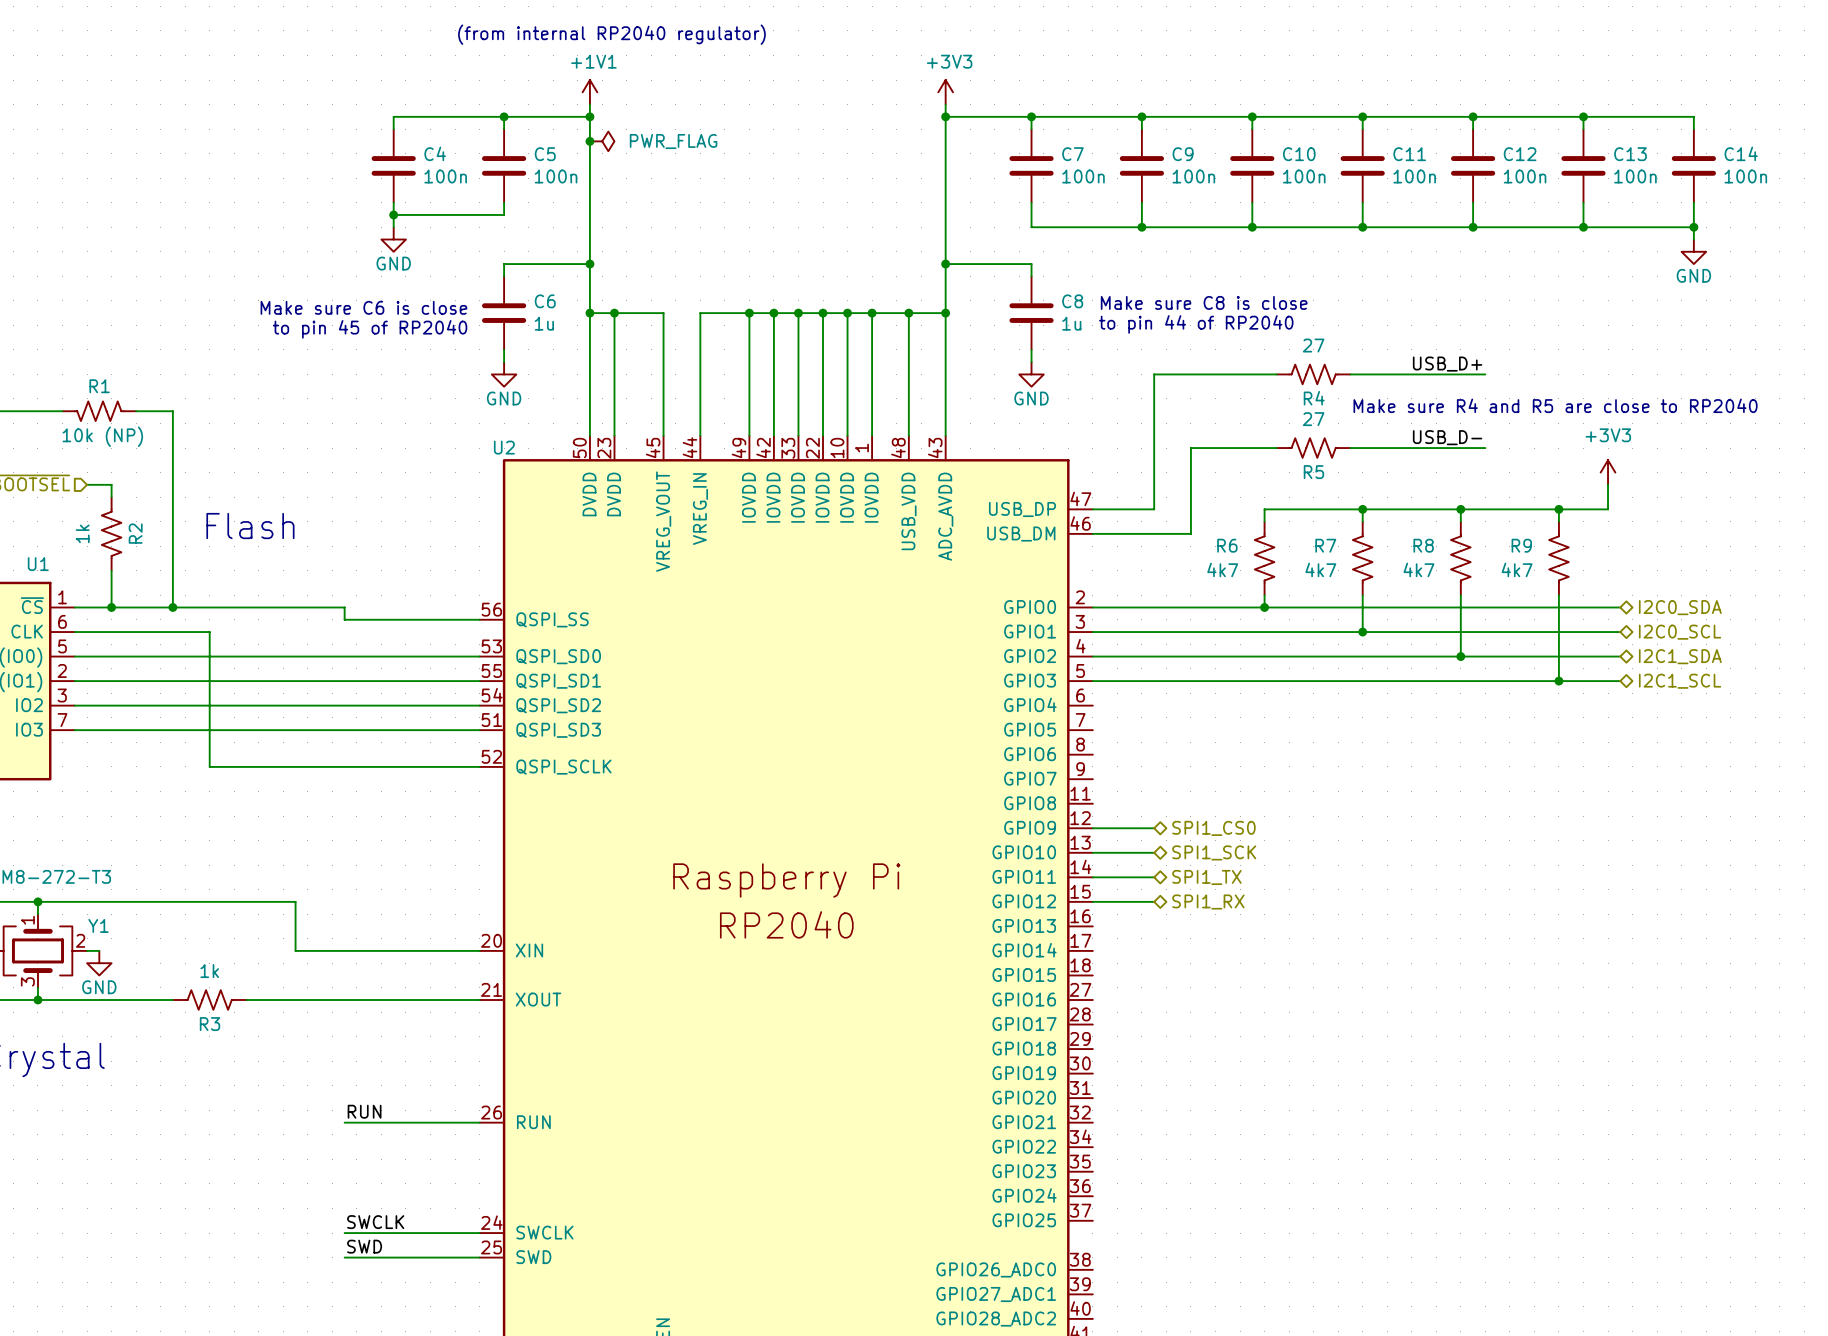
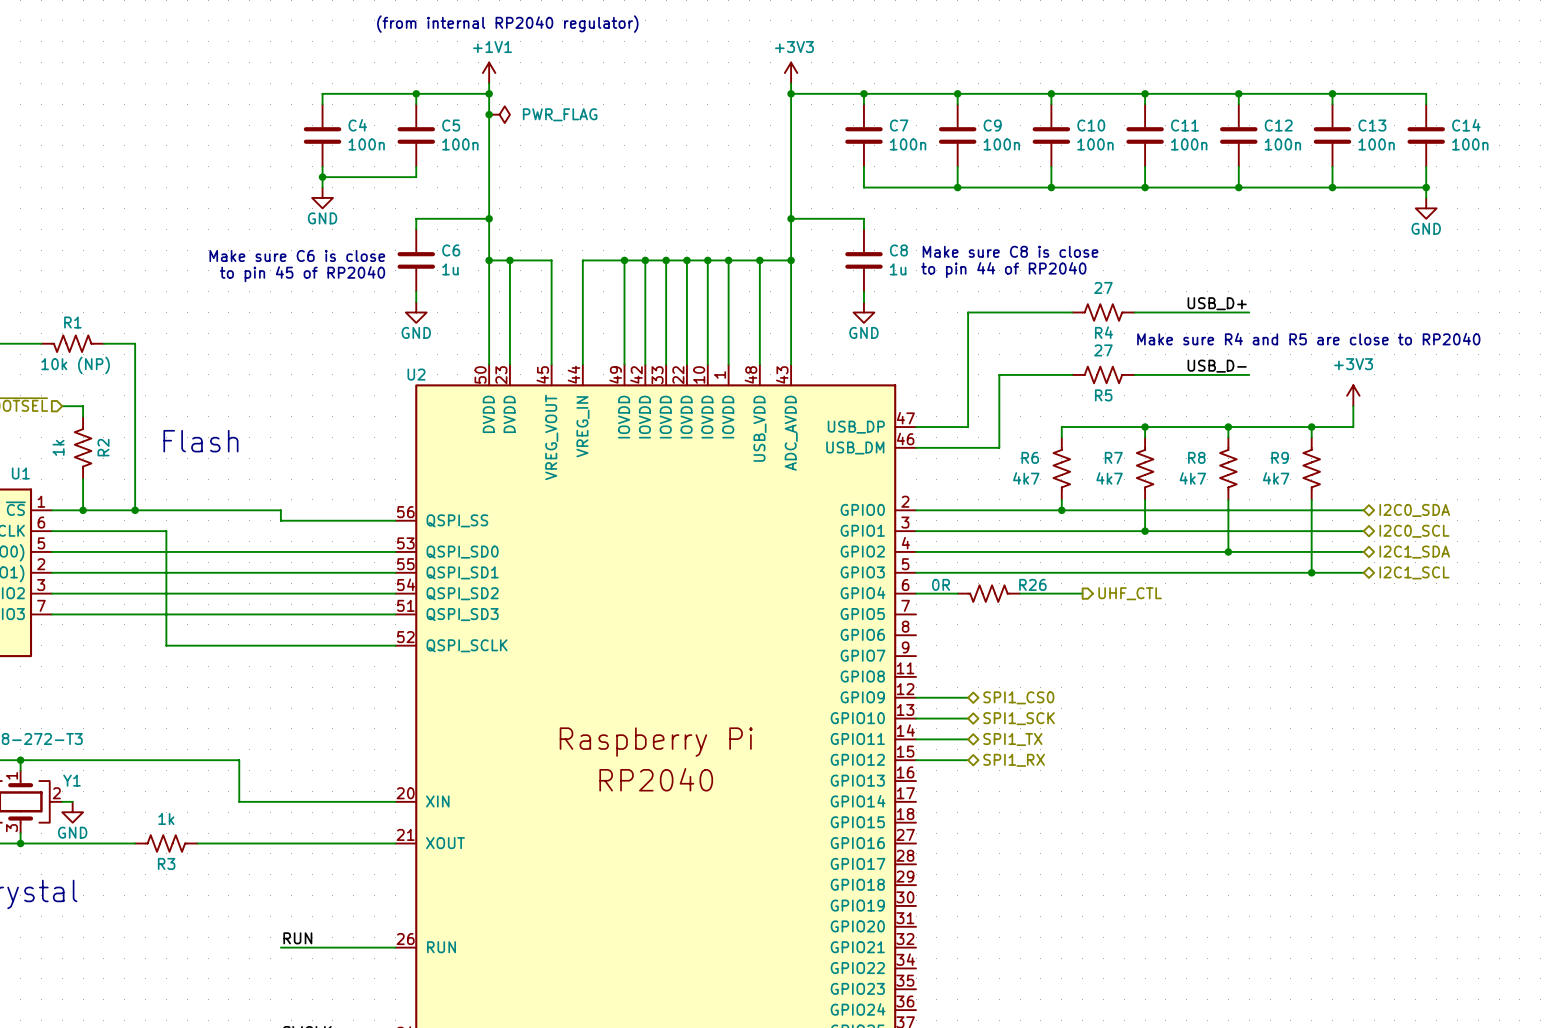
wire: none -> (916, 593) (957, 593)
R26: none -> 0R (988, 593)
wire: none -> (1020, 593) (1082, 593)
hierarchical label: none -> UHF_CTL (1130, 593)

